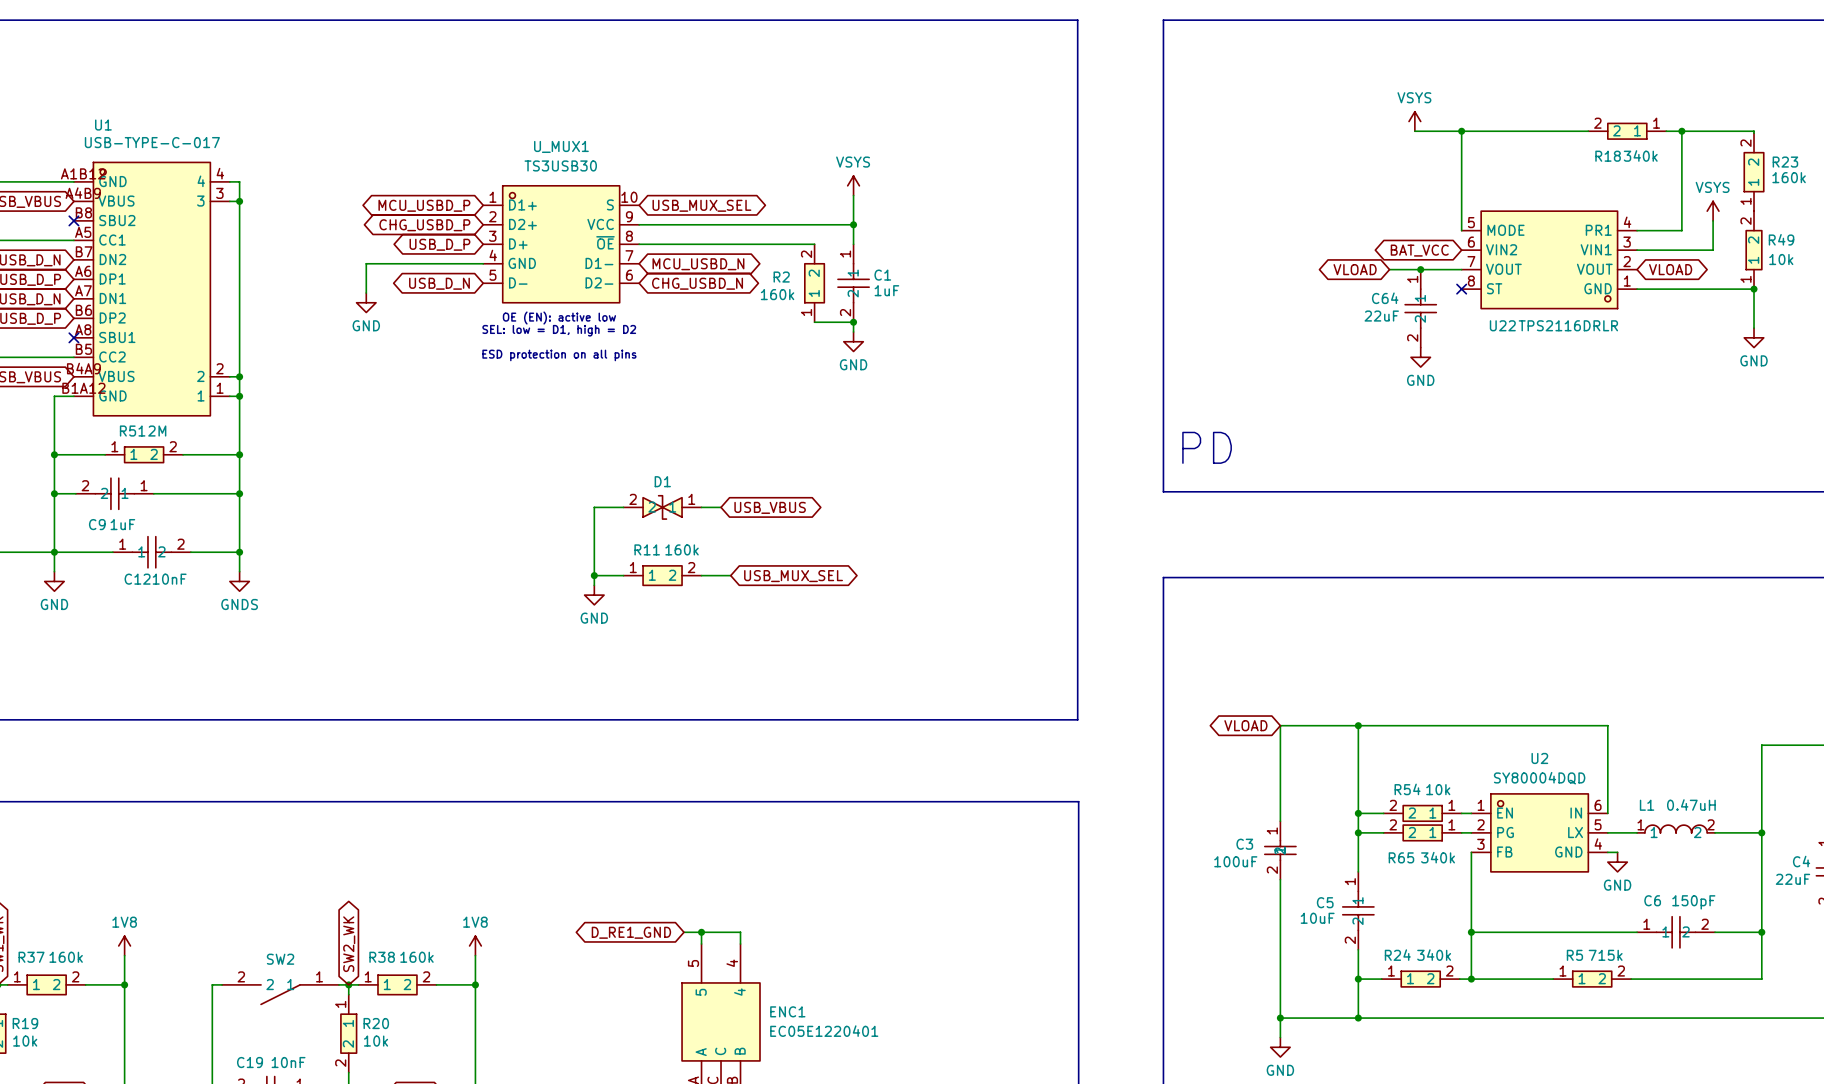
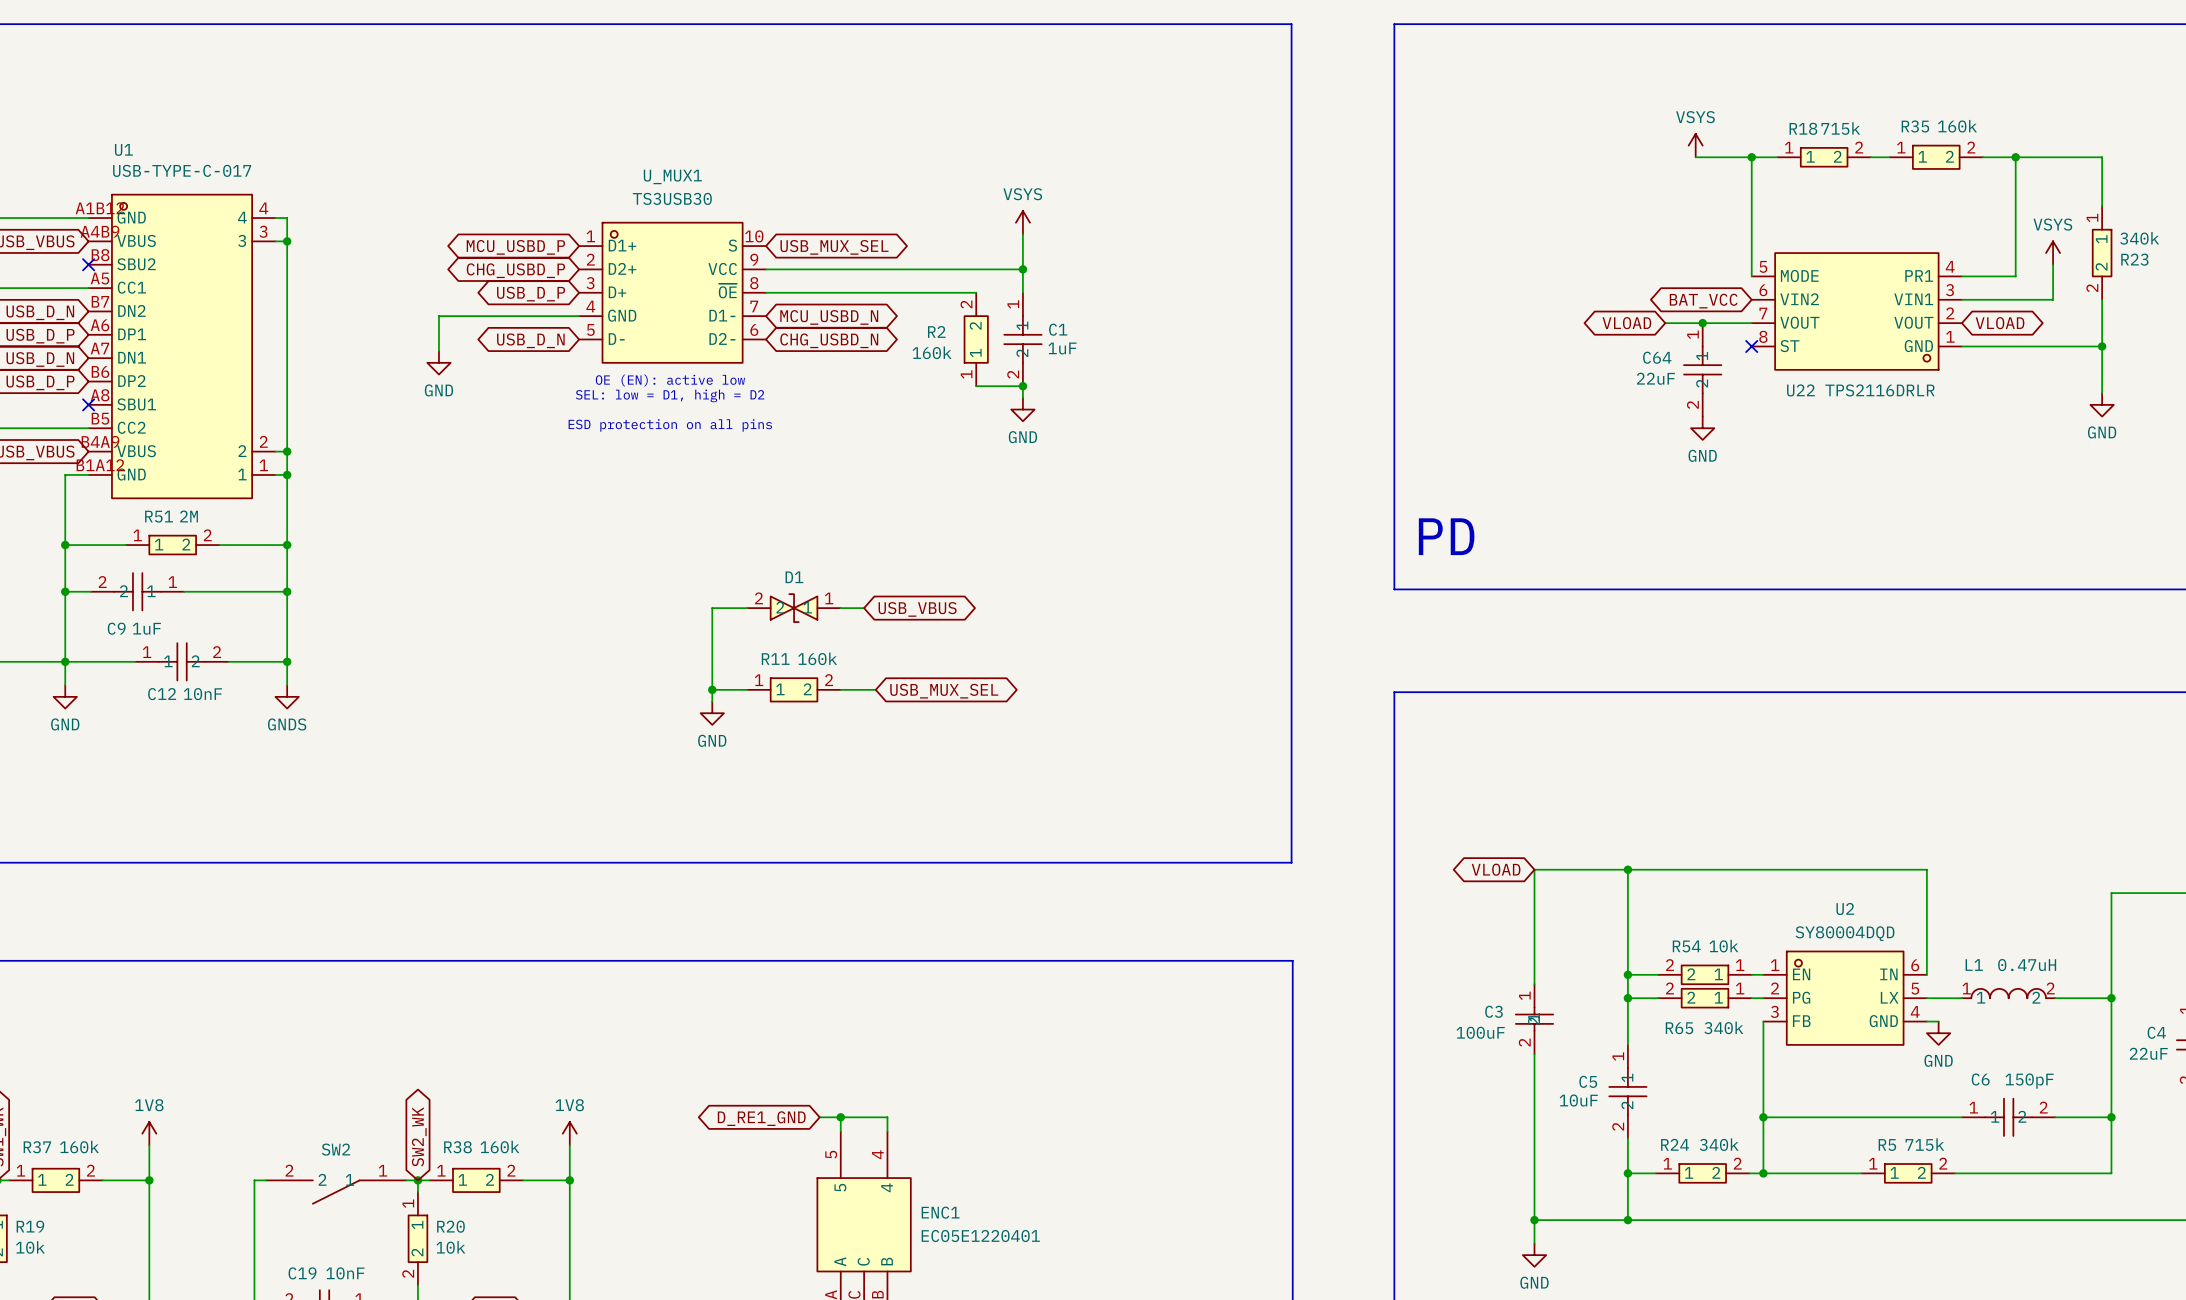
R18 value: none -> 715k (1840, 128)
R35: none -> (1936, 157)
R18 rotation: 0° (1627, 131) -> 180° (1824, 157)
R18 position: (1627, 131) -> (1824, 157)
R23 symbol: [1744, 133, 1764, 212] -> [2092, 206, 2112, 300]
R18 text: 340k (1640, 155) -> none
R18 name position: R18 (1608, 156) -> R18 (1803, 128)
R23 name position: R23 (1785, 162) -> R23 (2134, 259)
R23 text: 160k (1789, 177) -> 340k (2139, 238)
R49: (1754, 250) -> none

